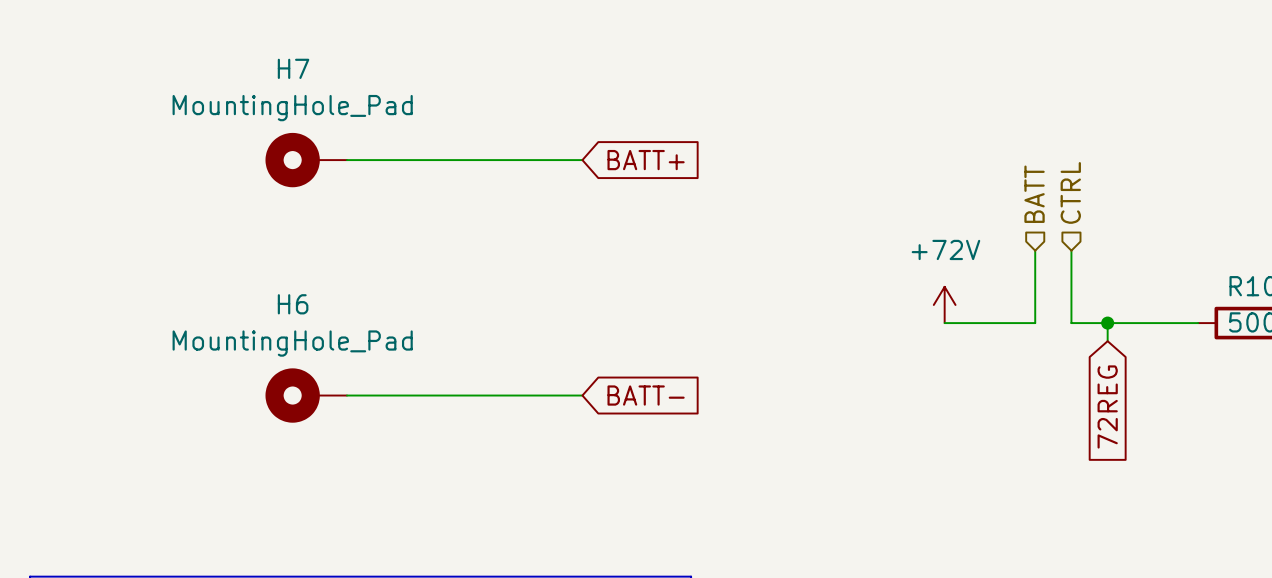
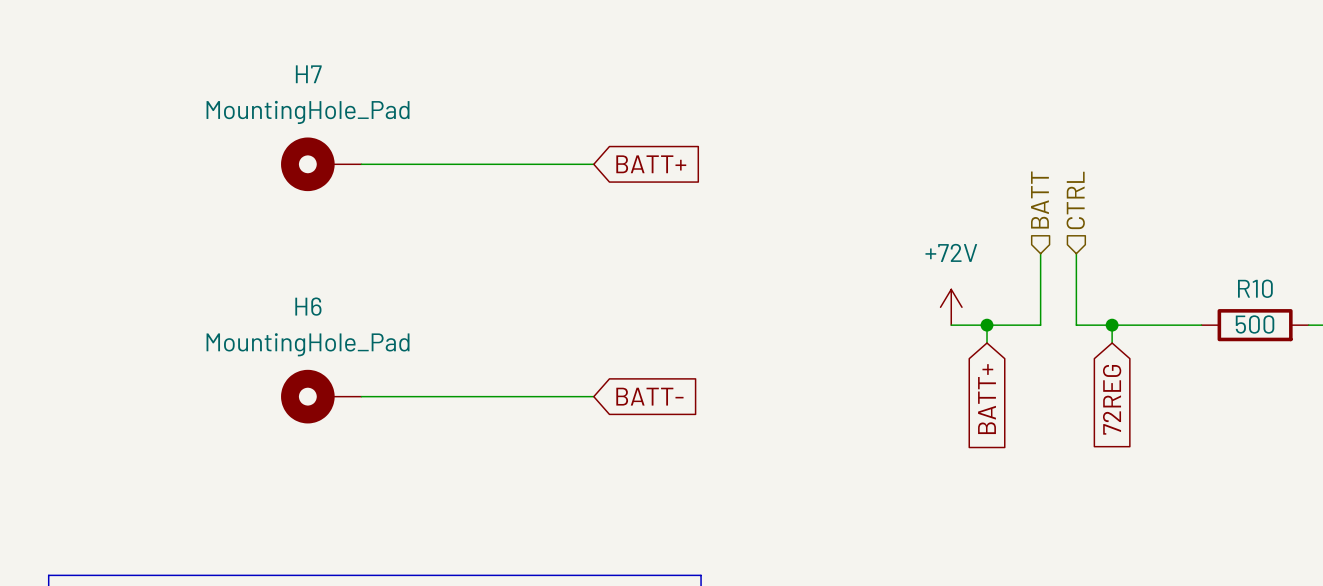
wire: none -> (987, 325) (987, 343)
junction: none -> (987, 325)
global label: none -> BATT+ (987, 399)

